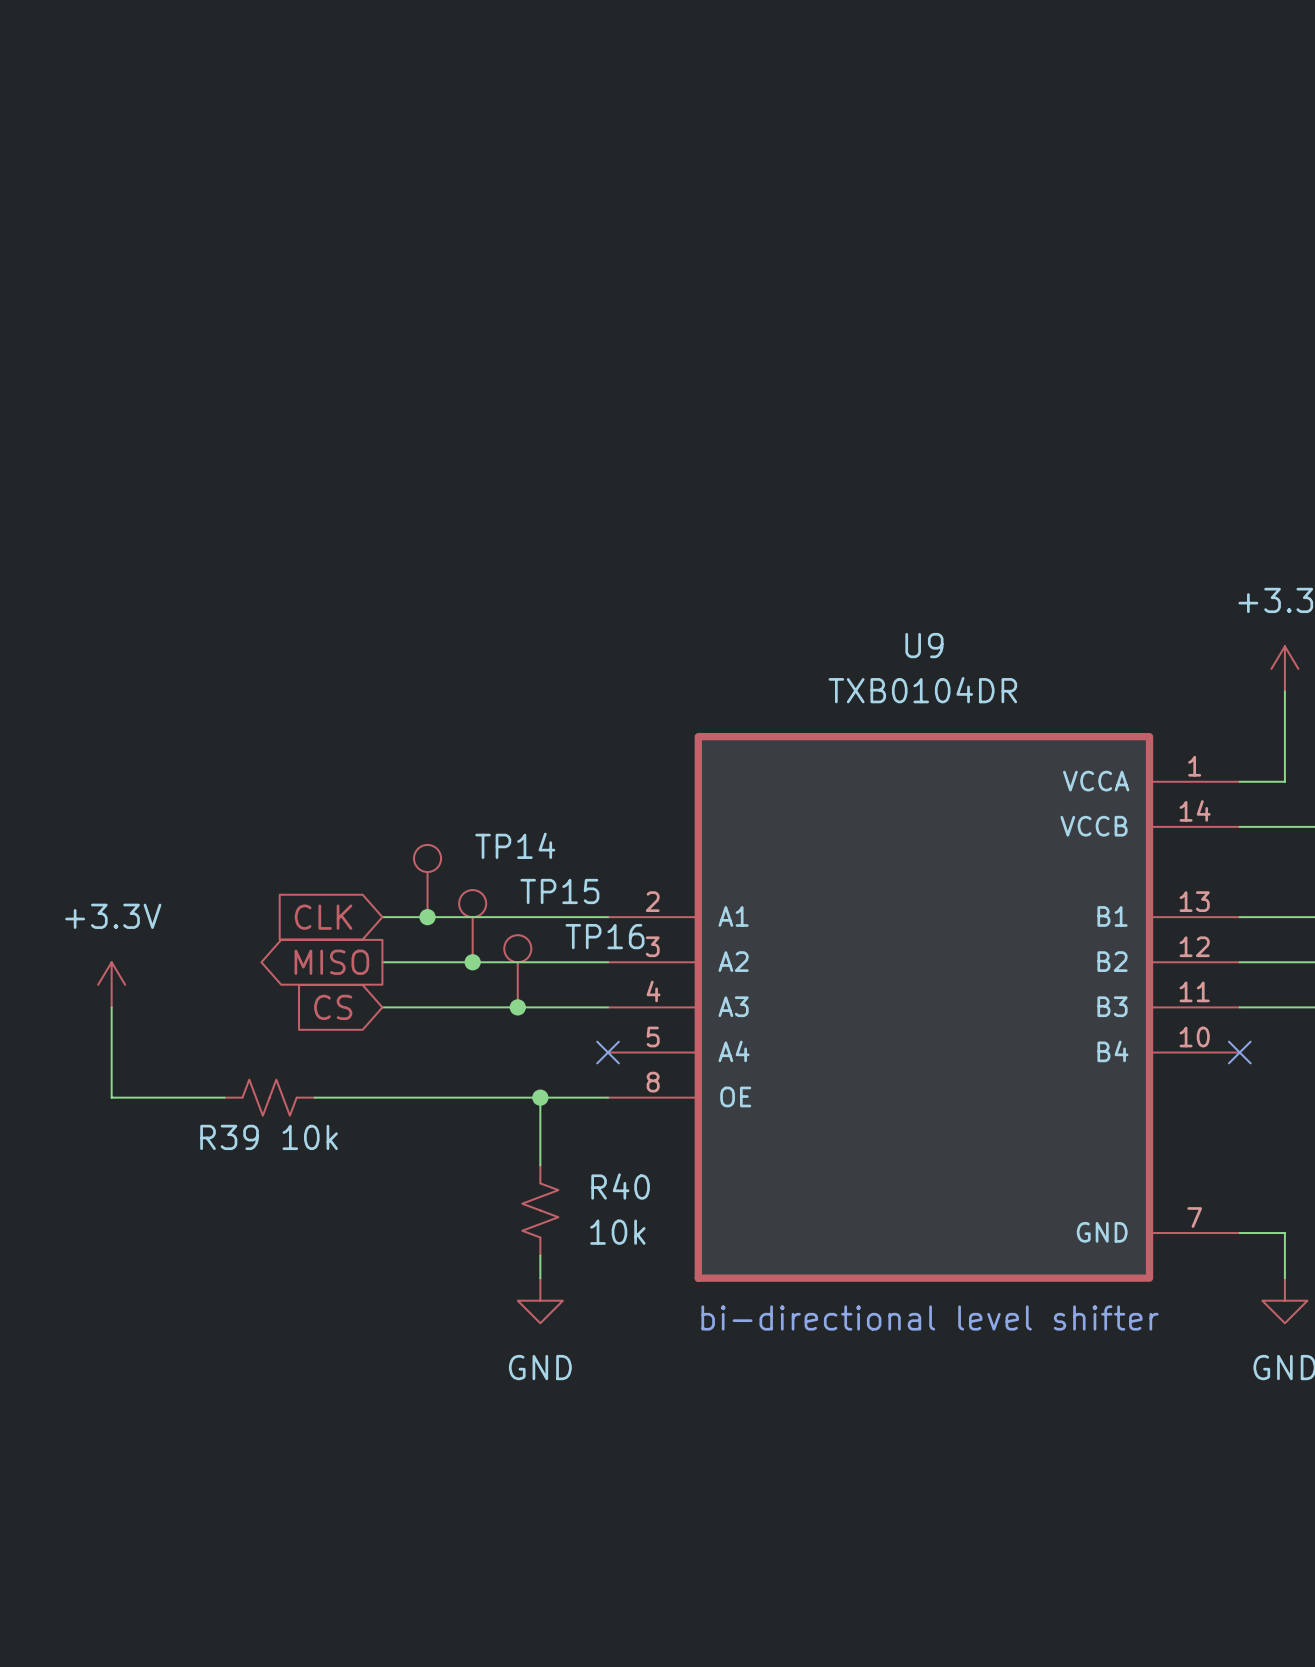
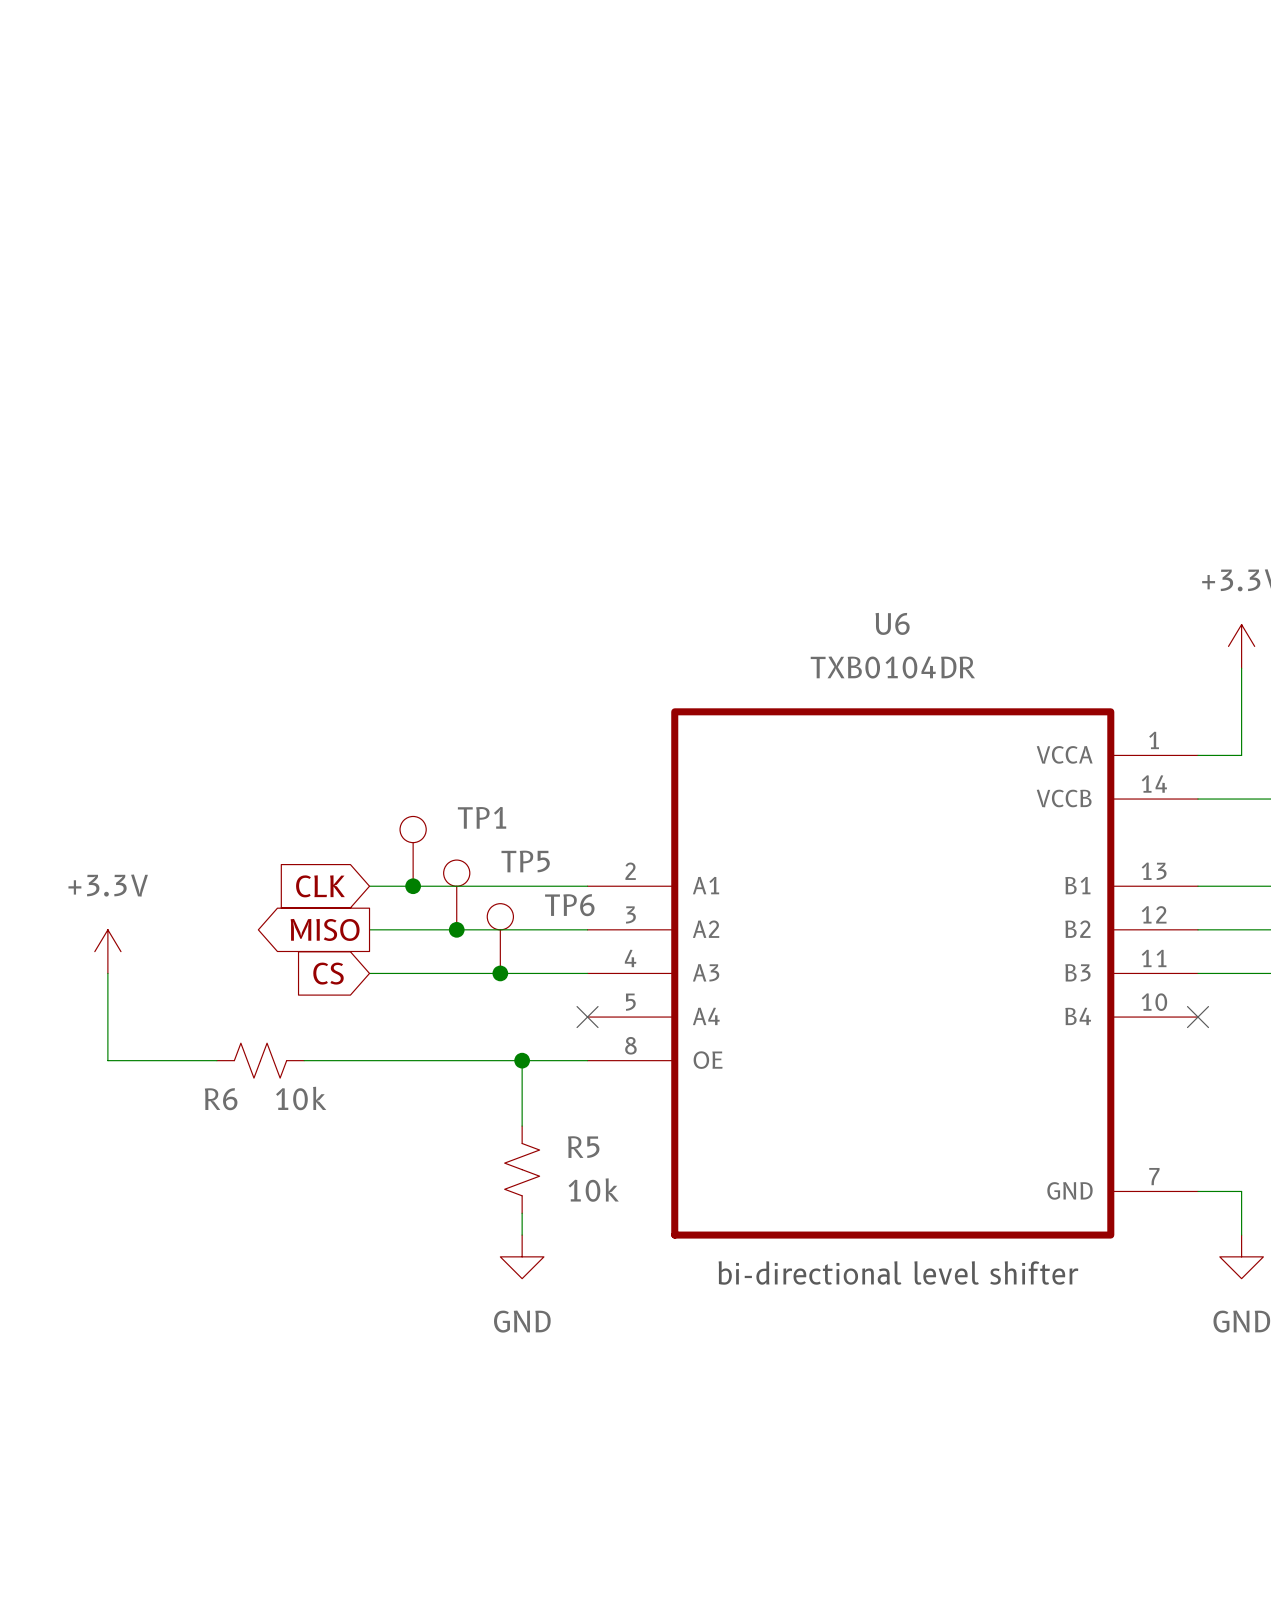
U9 name: U9 (924, 645) -> U6 (892, 623)
TP14 name: TP14 (515, 845) -> TP1 (482, 817)
TP15 name: TP15 (559, 891) -> TP5 (525, 861)
TP16 name: TP16 (604, 936) -> TP6 (569, 905)
R39 name: R39 (229, 1137) -> R6 (221, 1099)
R40 name: R40 (620, 1186) -> R5 (583, 1147)

